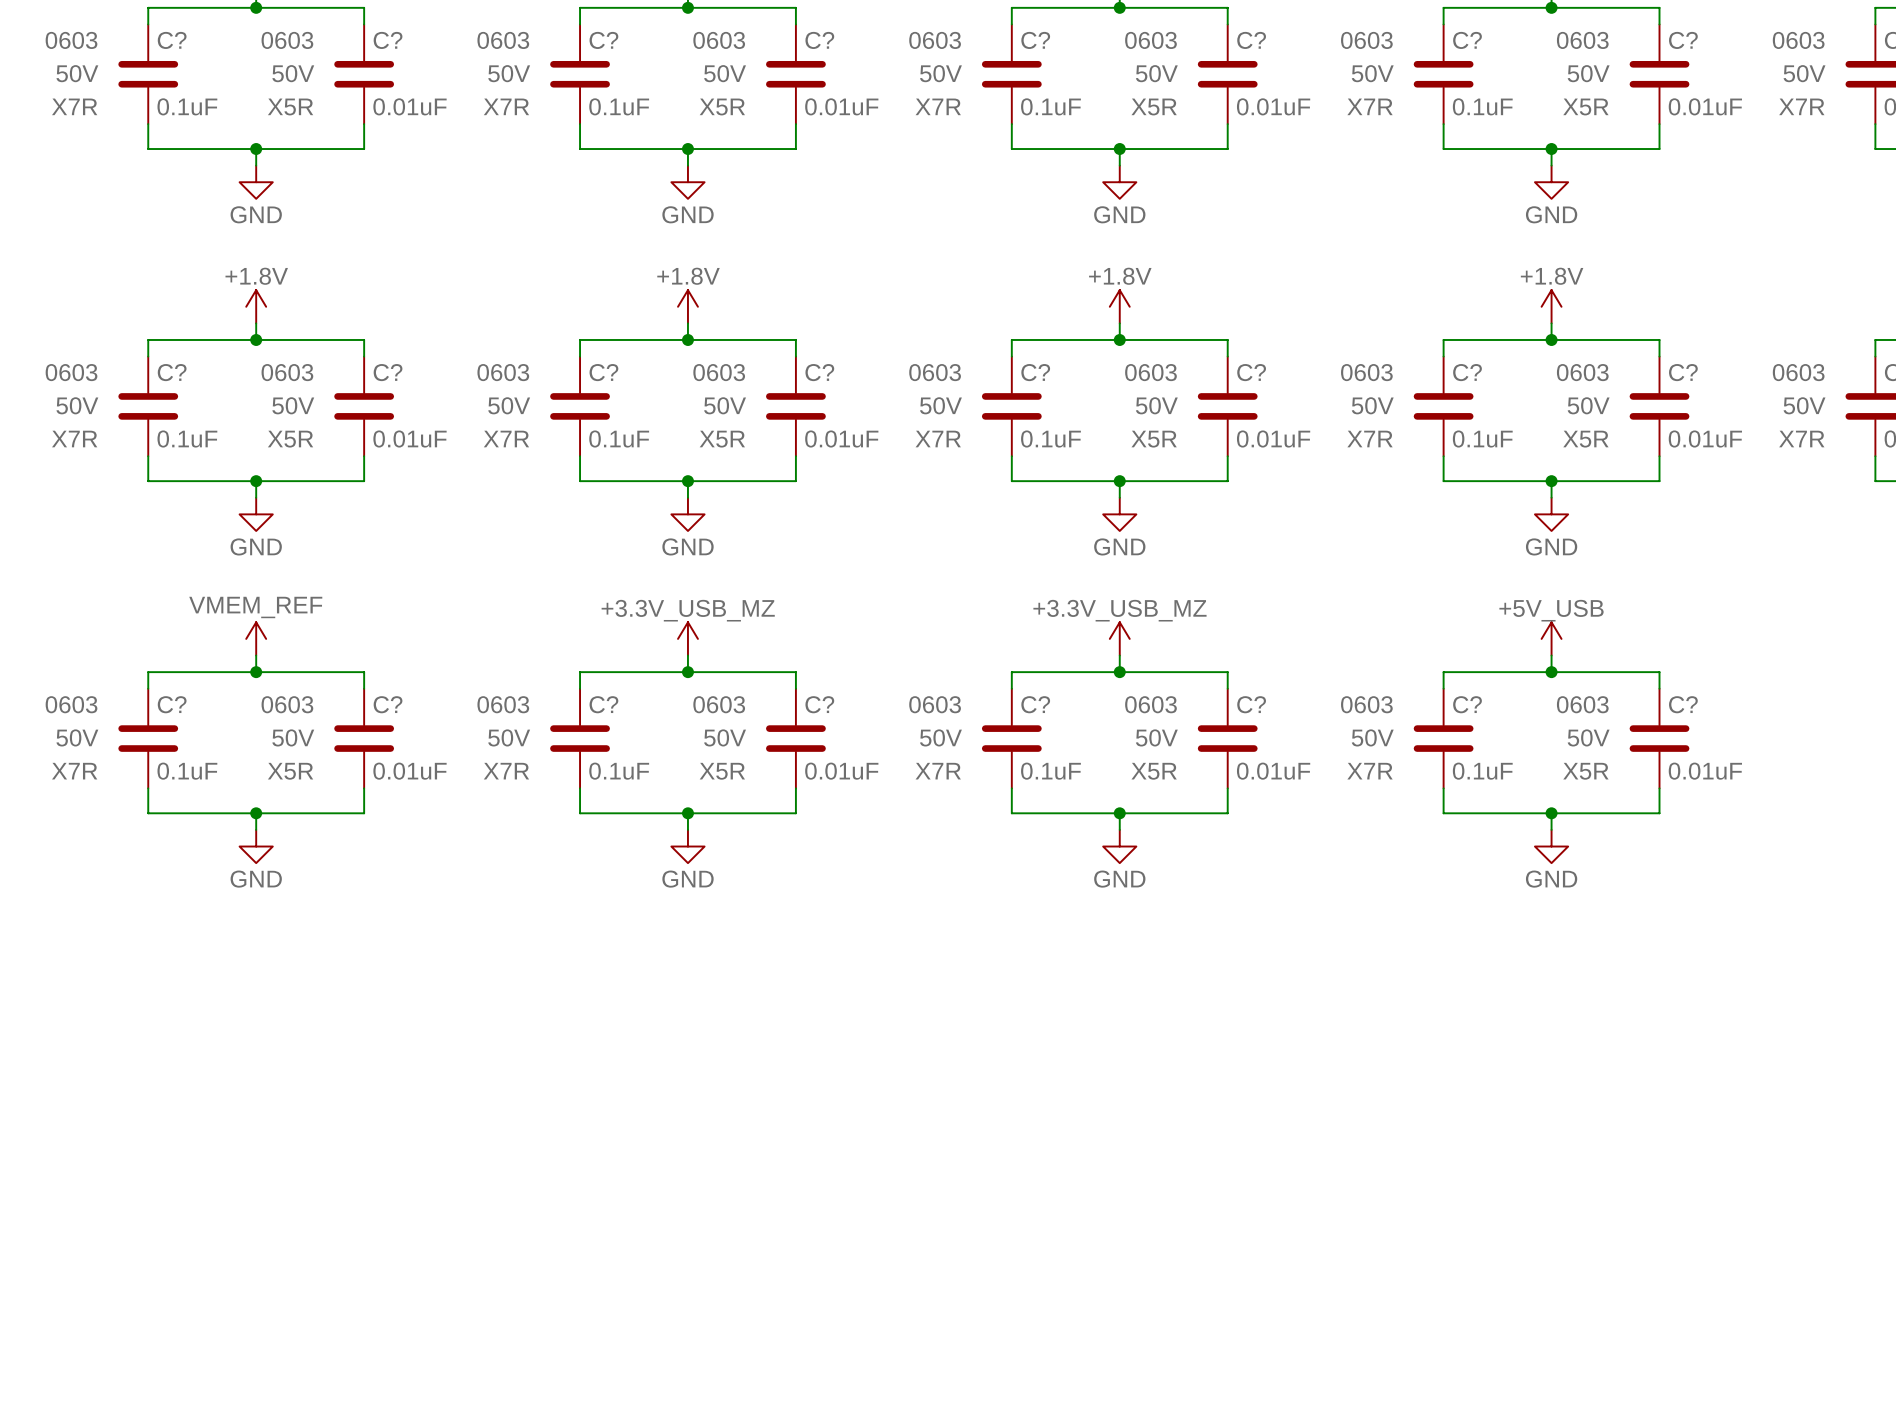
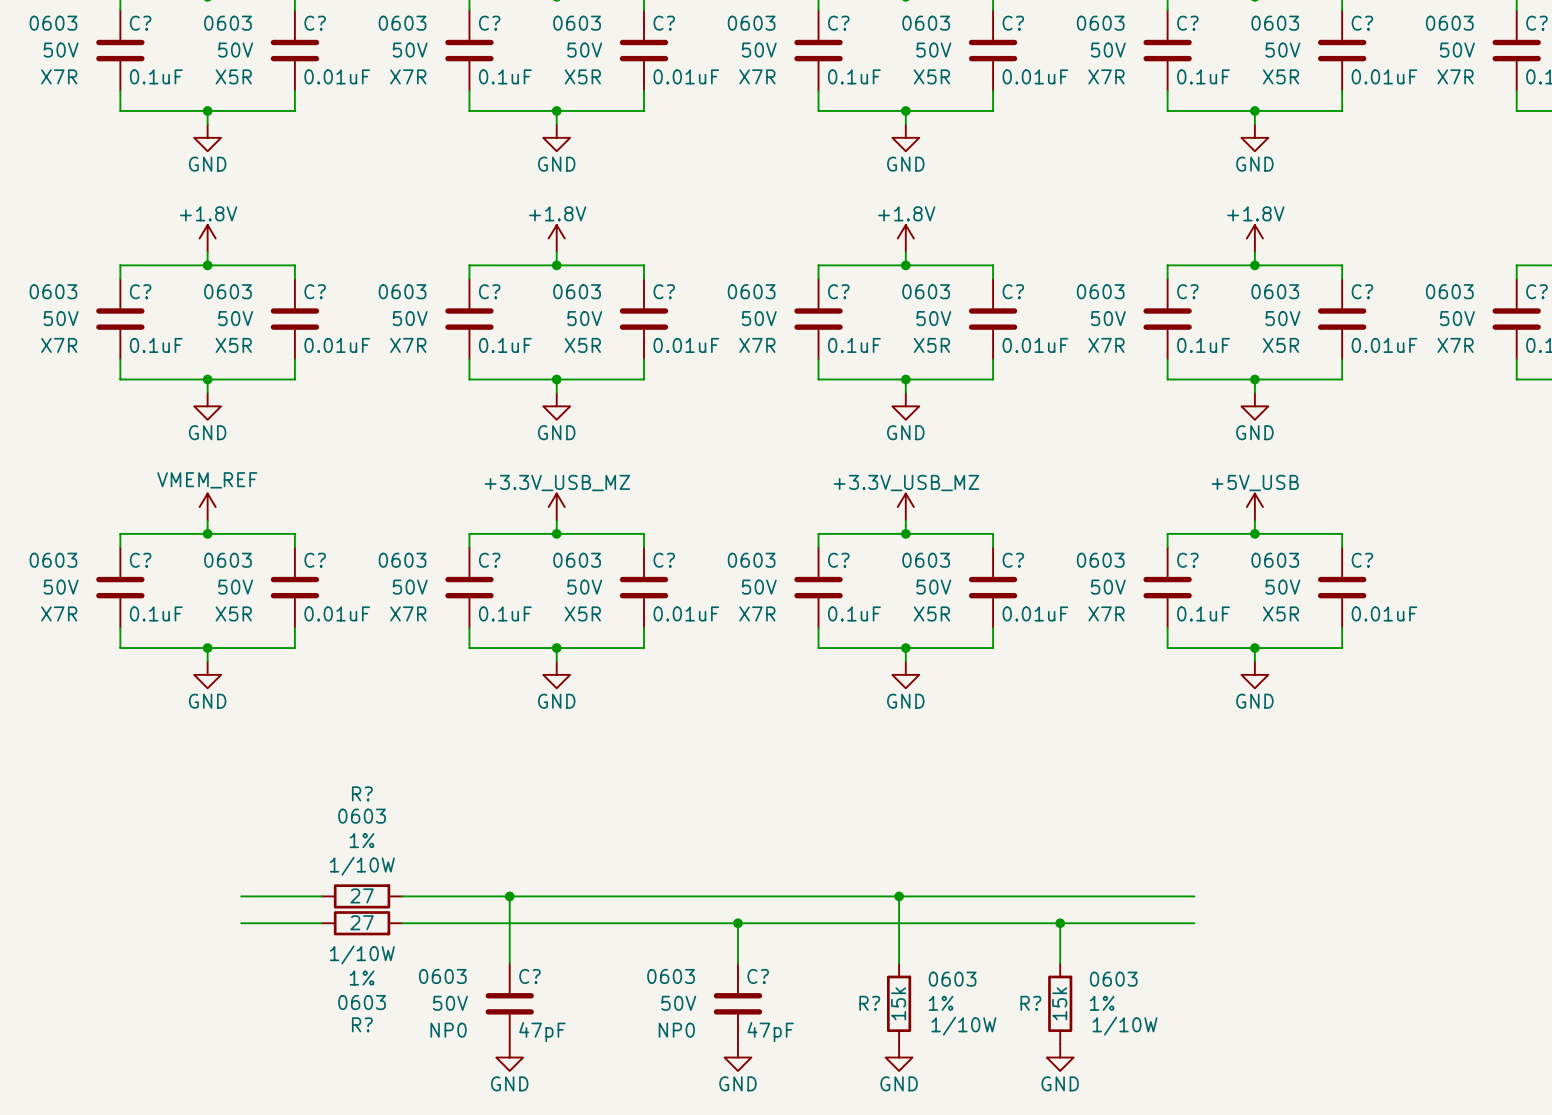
wire: none -> (241, 896) (321, 896)
R?: none -> 27 (362, 896)
wire: none -> (402, 896) (1194, 896)
wire: none -> (509, 896) (509, 963)
junction: none -> (509, 896)
wire: none -> (899, 896) (899, 963)
junction: none -> (899, 896)
wire: none -> (241, 923) (321, 923)
R?: none -> 27 (362, 923)
wire: none -> (402, 923) (1194, 923)
wire: none -> (737, 923) (737, 963)
junction: none -> (737, 923)
wire: none -> (1060, 923) (1060, 963)
junction: none -> (1060, 923)
C?: none -> 47pF (509, 1003)
C?: none -> 47pF (737, 1003)
R?: none -> 15k (899, 1003)
R?: none -> 15k (1060, 1003)
power symbol: none -> GND (509, 1057)
power symbol: none -> GND (737, 1057)
power symbol: none -> GND (899, 1057)
power symbol: none -> GND (1060, 1057)

